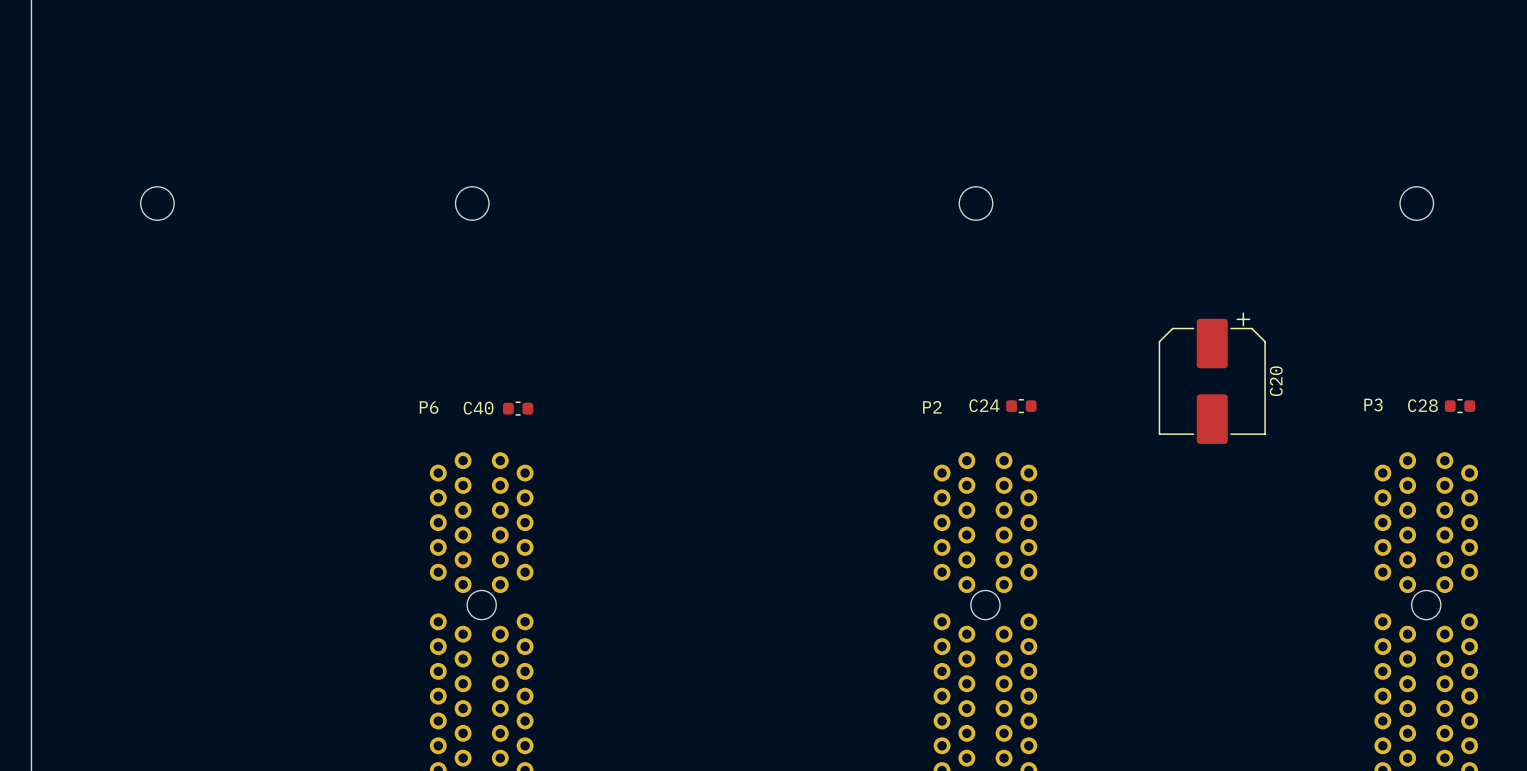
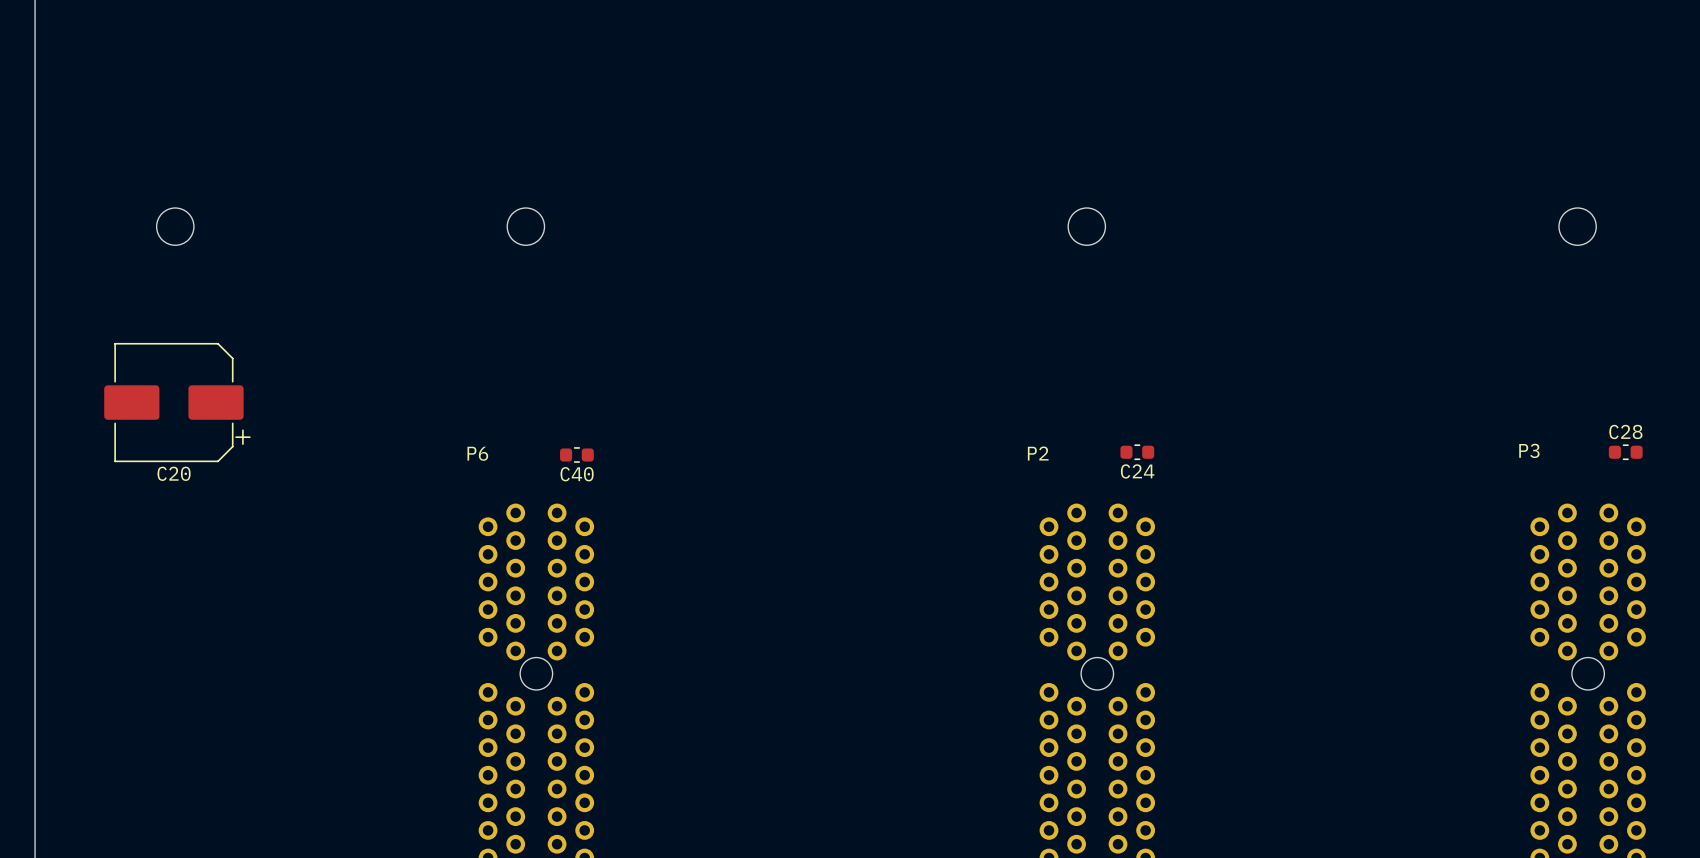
C20 rotation: 0° (1212, 378) -> 90° clockwise (177, 402)
C20 position: (1212, 378) -> (177, 402)
C24 name position: C24 (984, 405) -> C24 (1137, 471)
C28 name position: C28 (1422, 405) -> C28 (1625, 431)
C40 name position: C40 (478, 408) -> C40 (577, 474)

